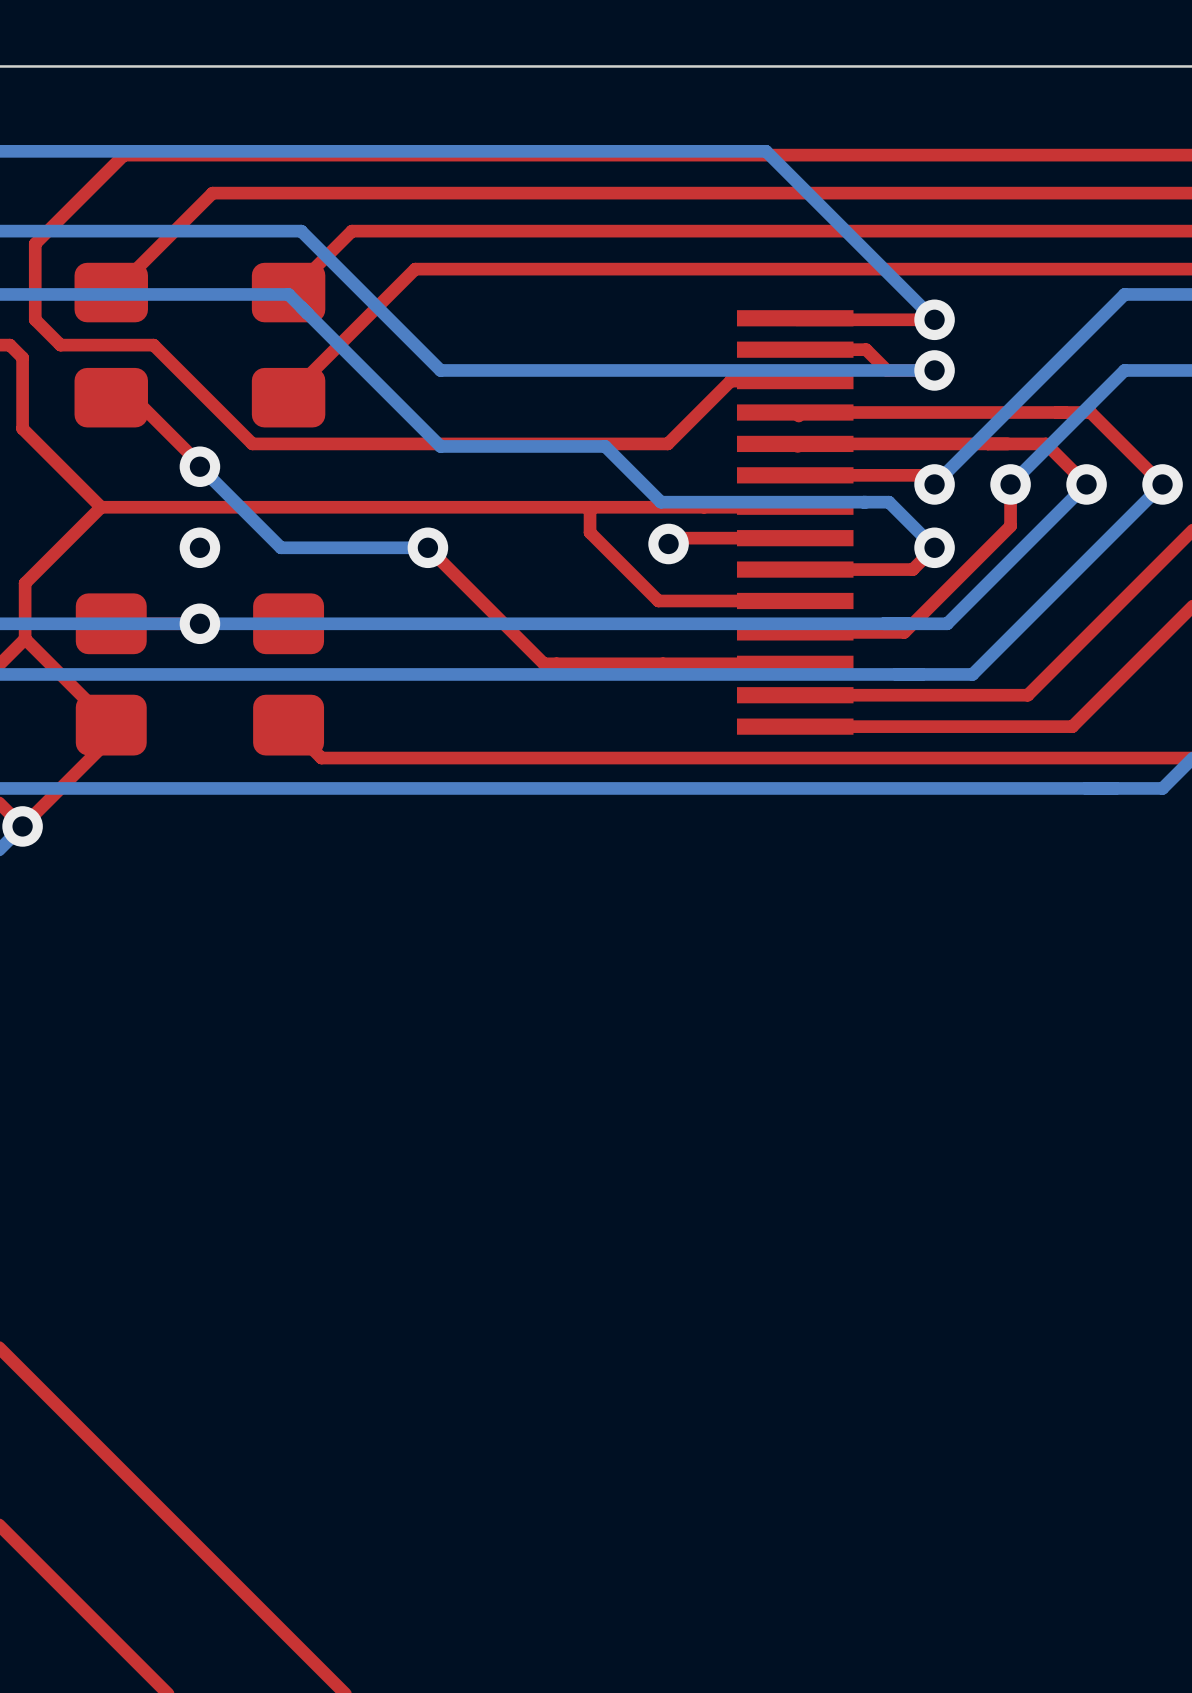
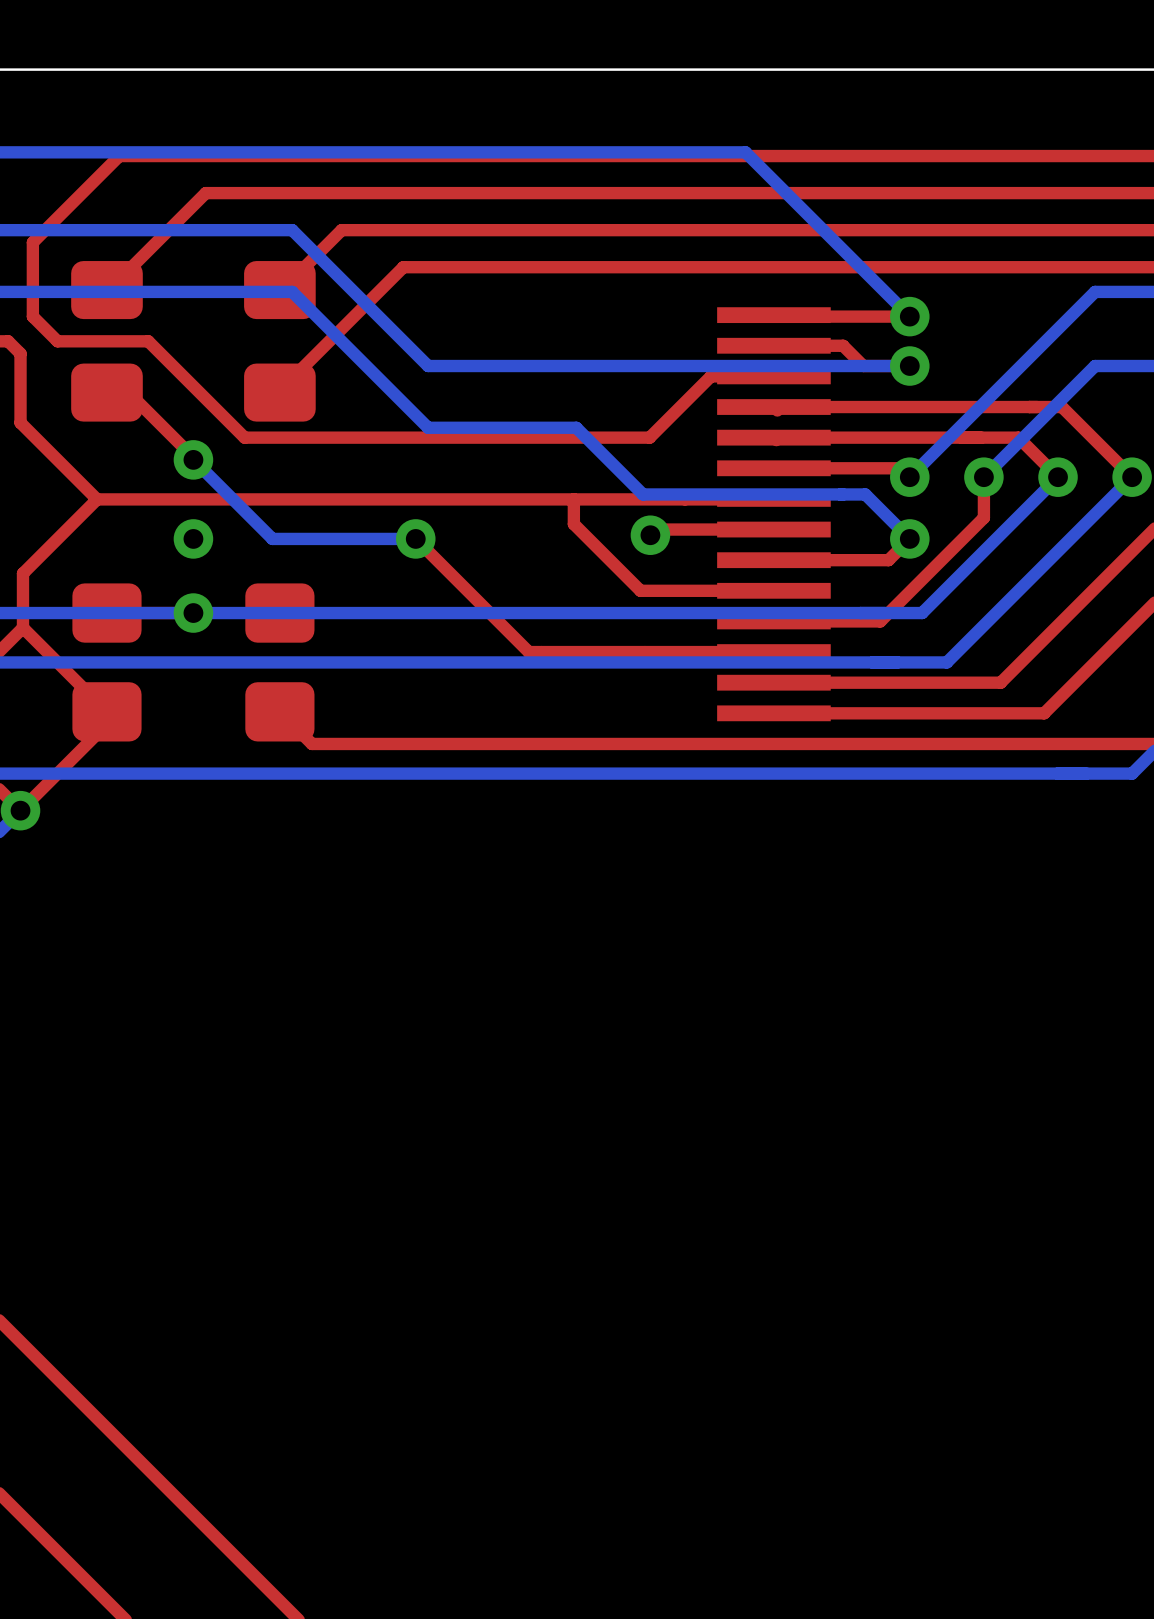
bottom track: (288, 294) (440, 446) (605, 446) -> (279, 291) (292, 291) (428, 427) (576, 427) (588, 440)

